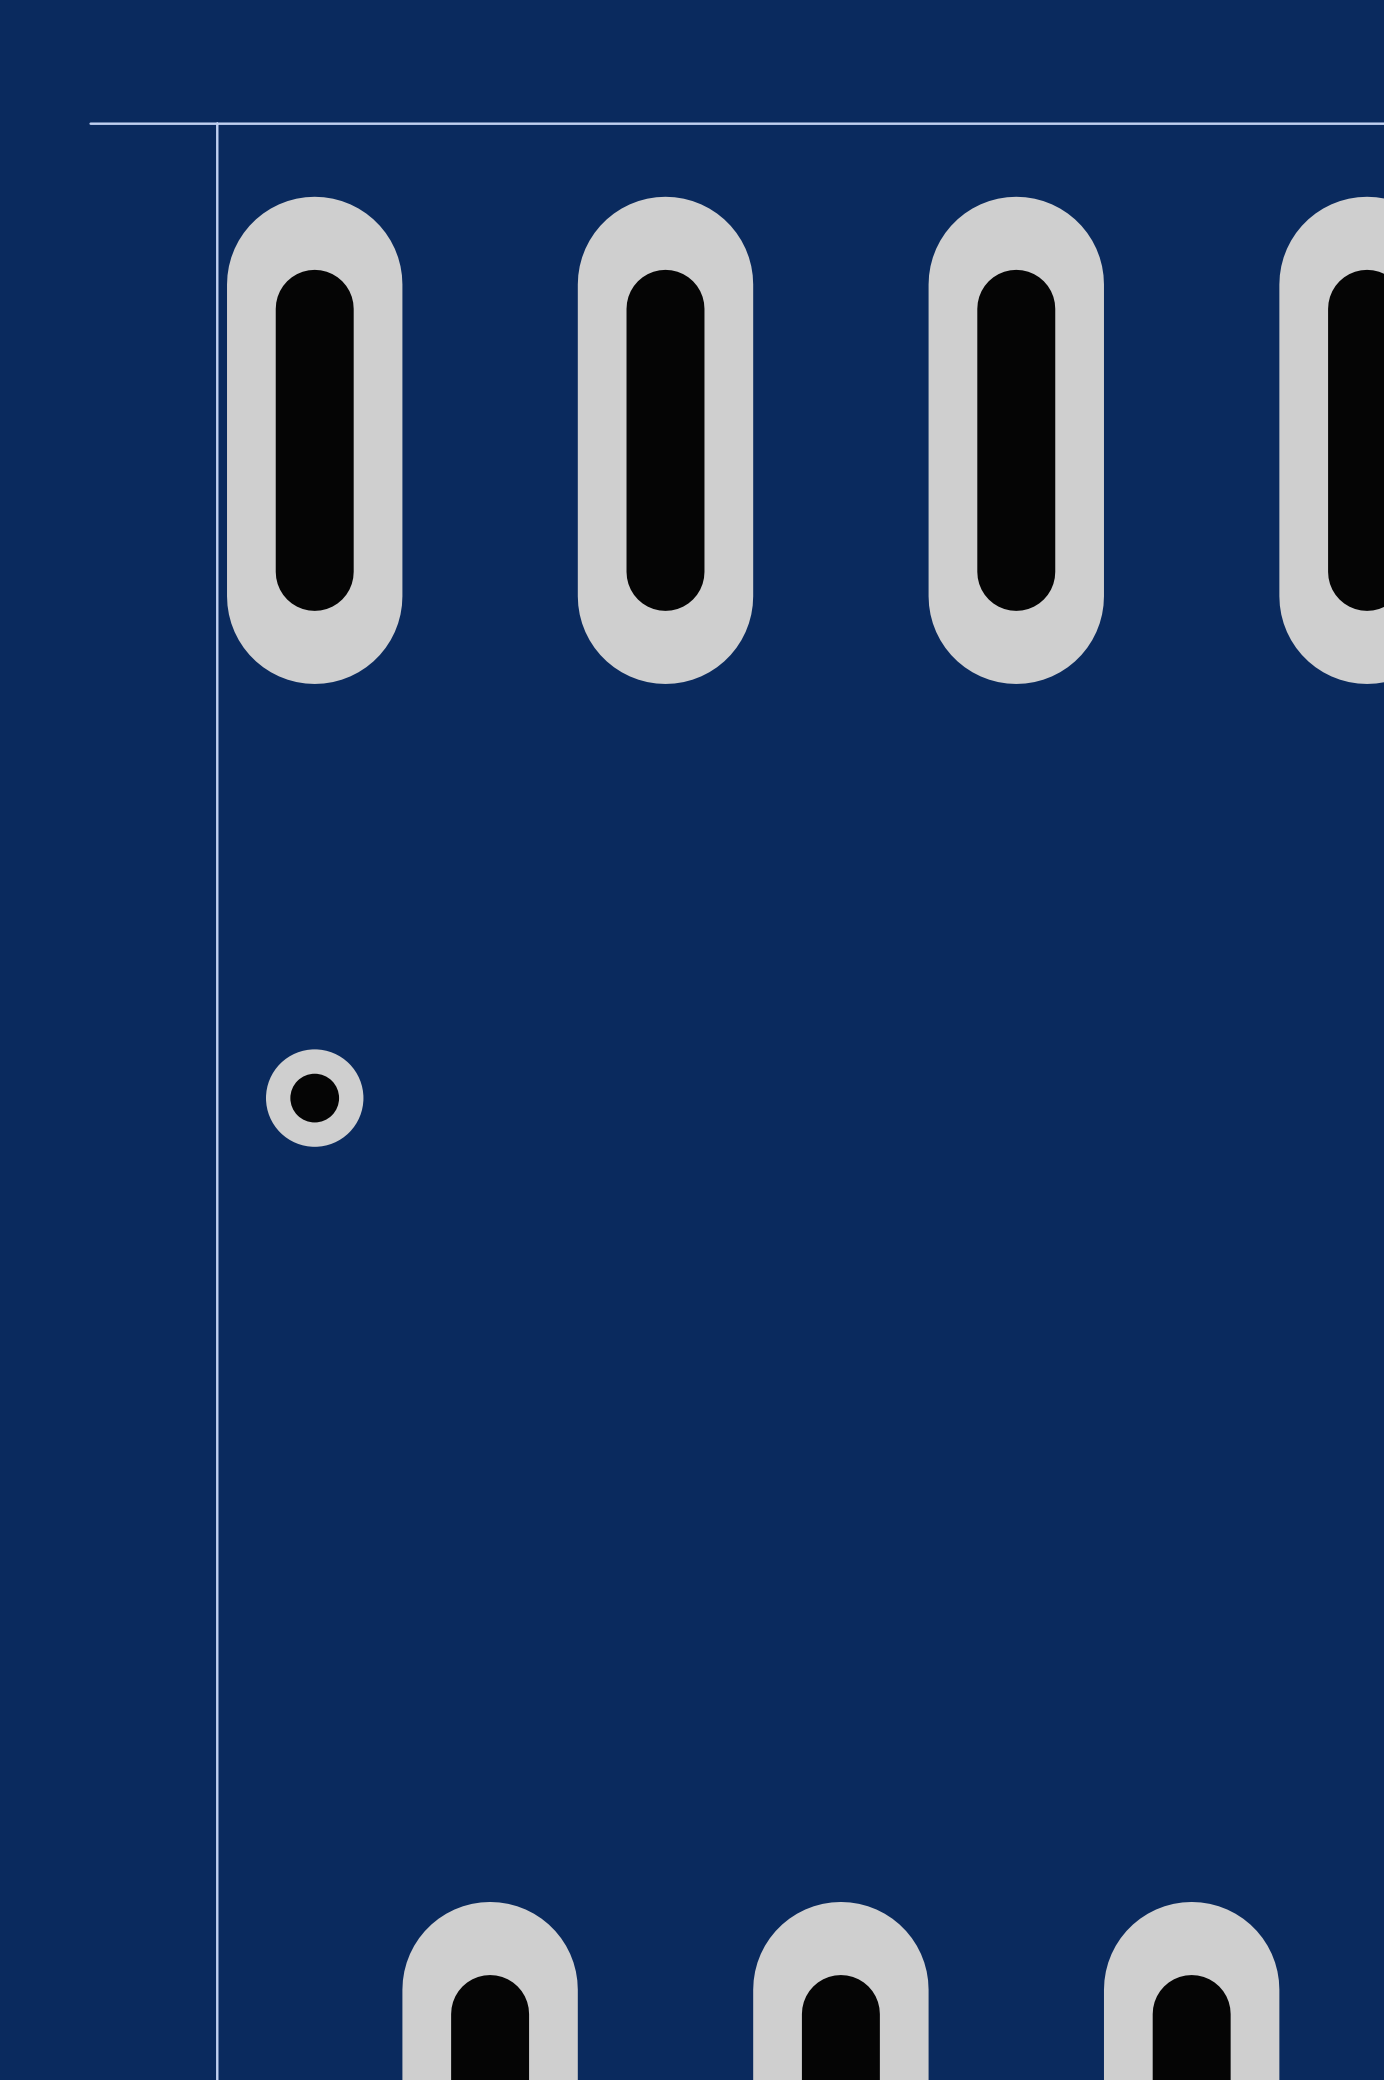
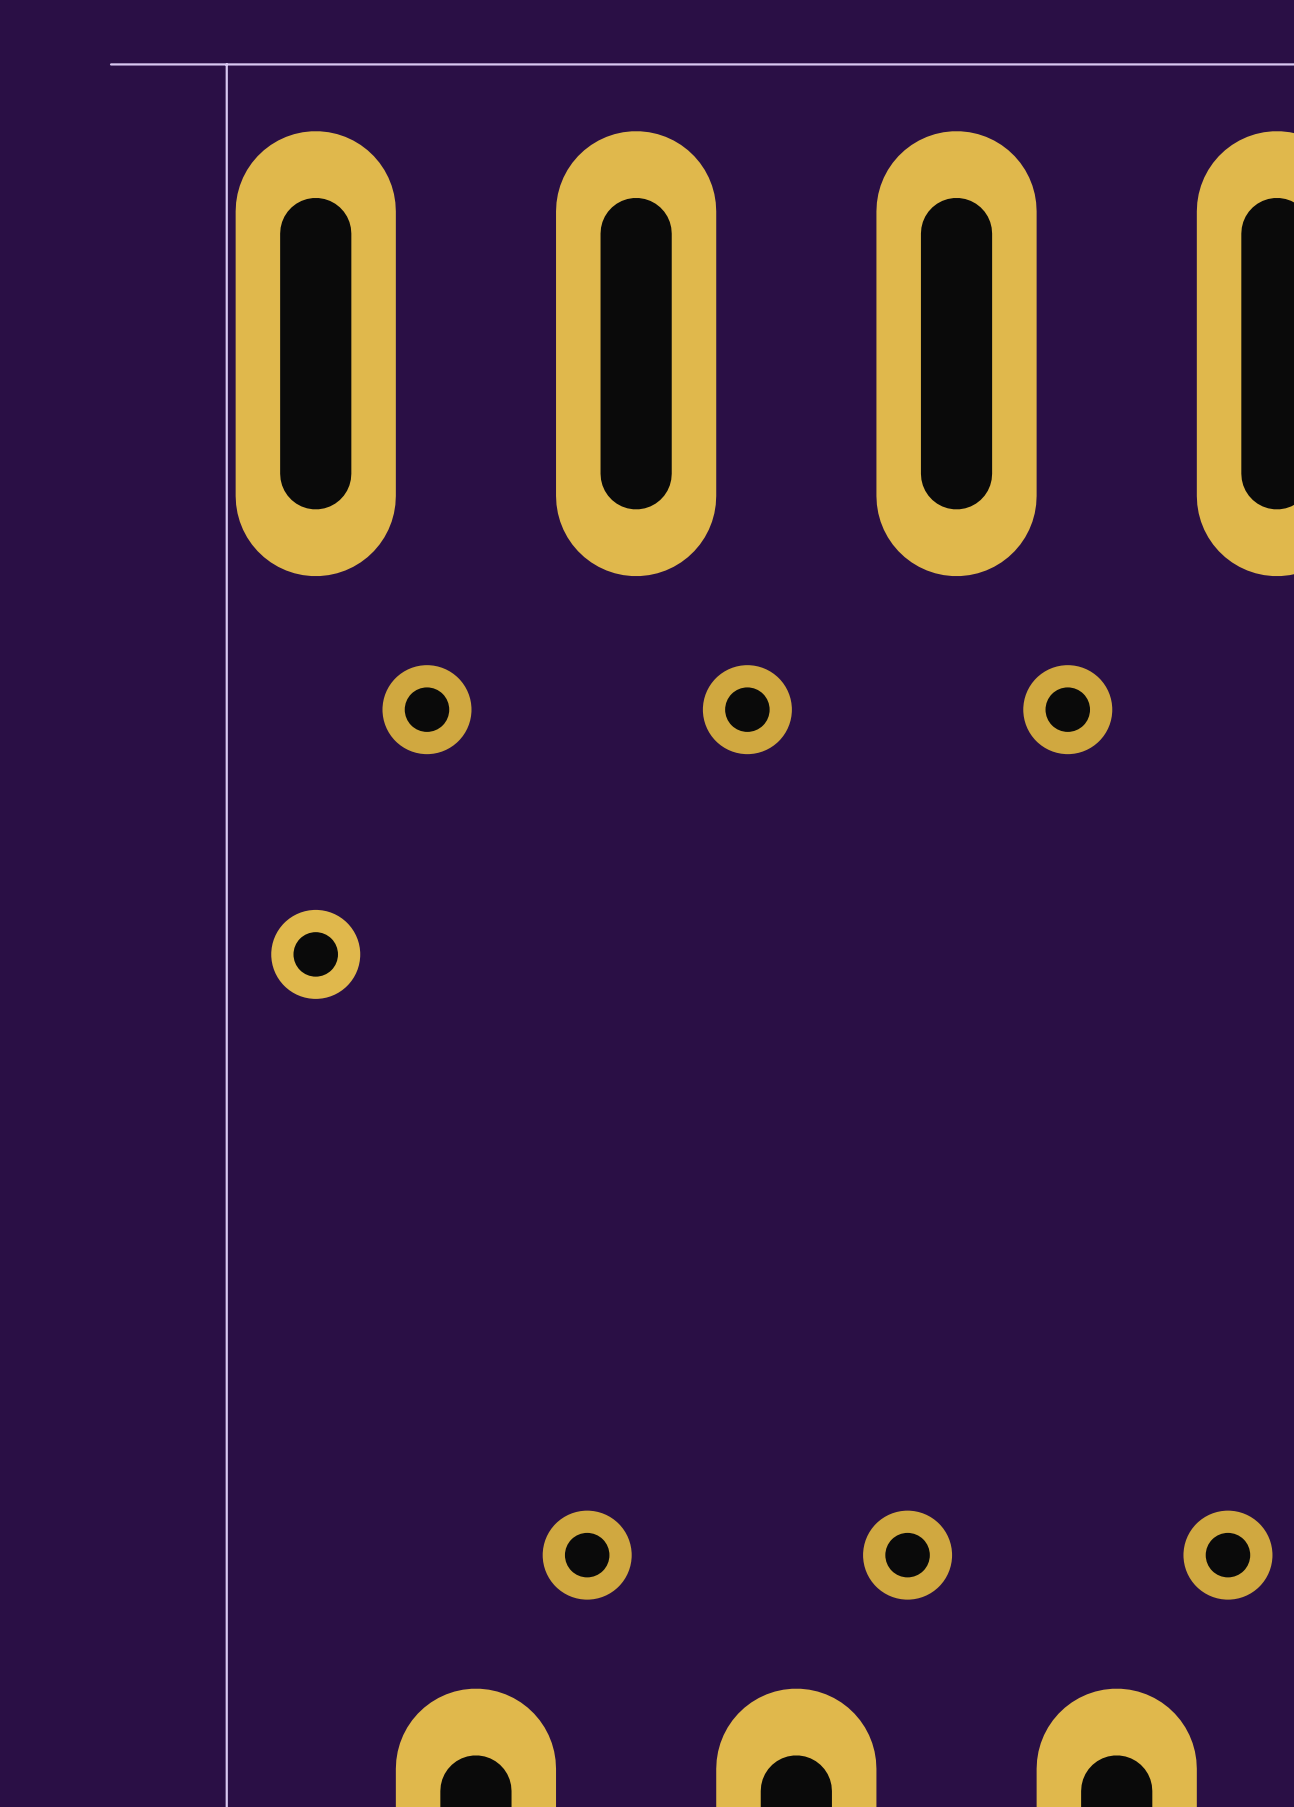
via: none -> (426, 709)
via: none -> (747, 709)
via: none -> (1067, 709)
via: none -> (587, 1555)
via: none -> (907, 1555)
via: none -> (1227, 1555)

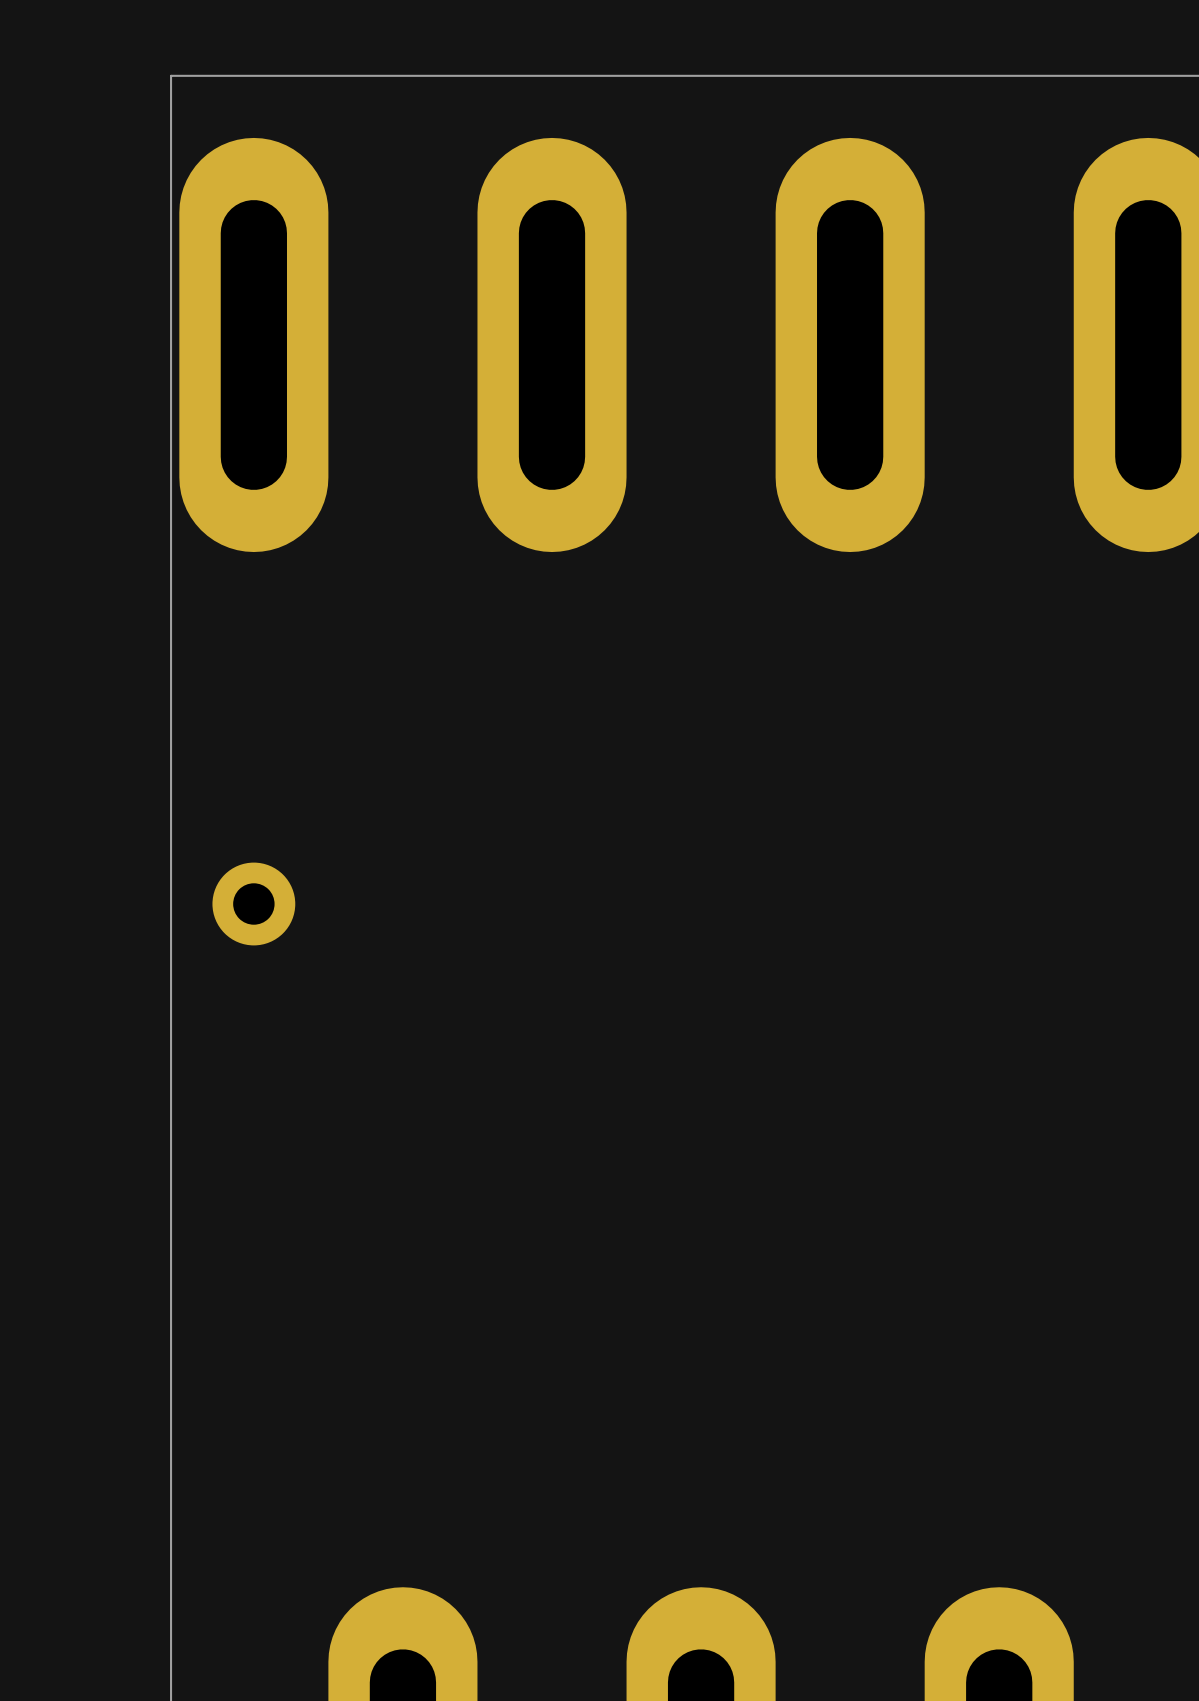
board edge: (226, 64) (111, 64) -> none
via: (426, 709) -> none
via: (747, 709) -> none
via: (1067, 709) -> none
via: (587, 1555) -> none
via: (907, 1555) -> none
via: (1227, 1555) -> none

